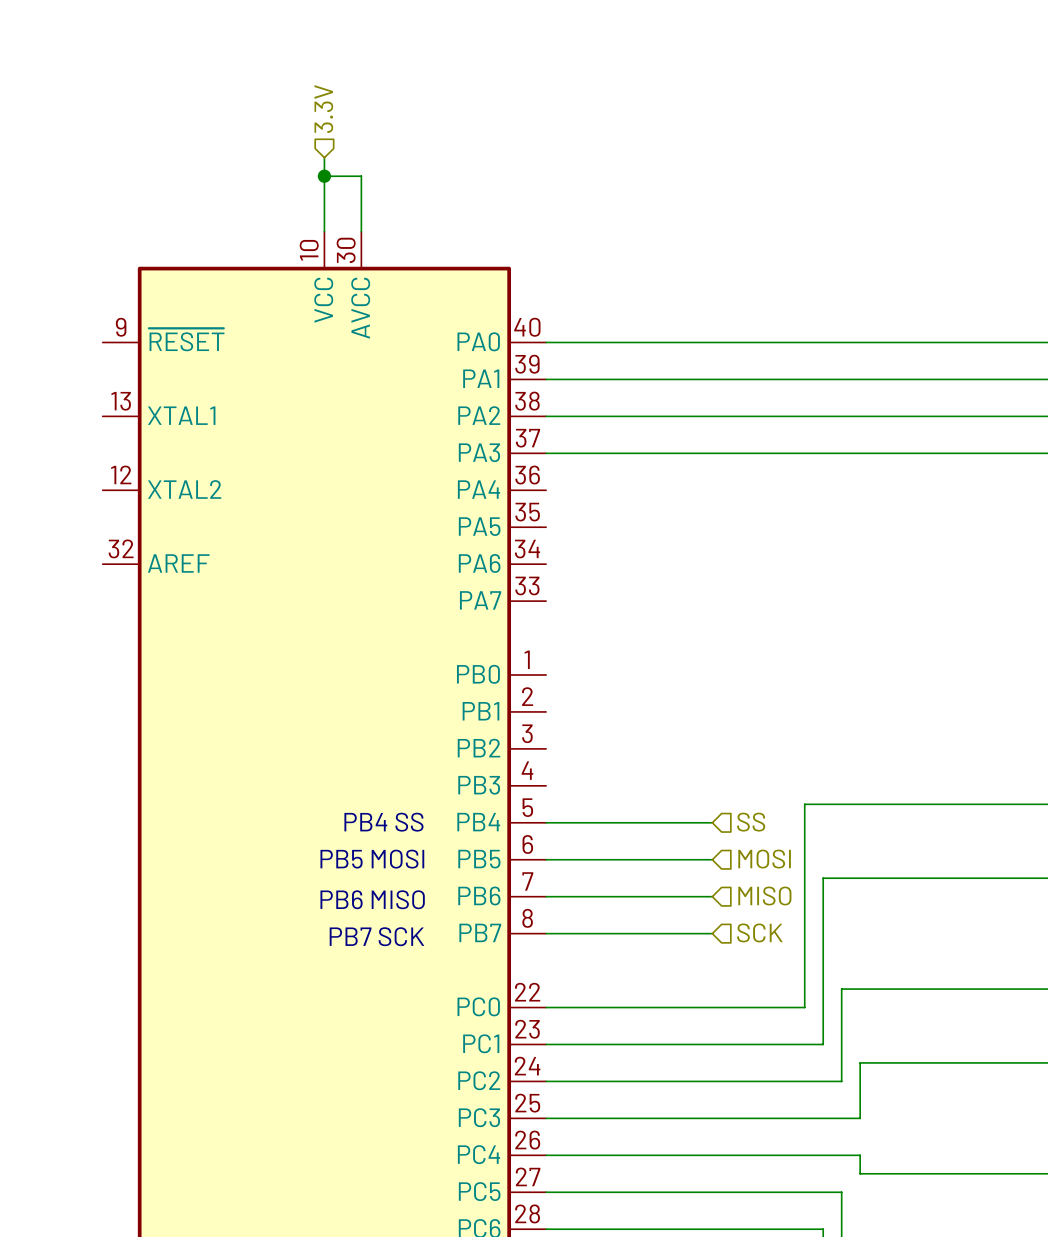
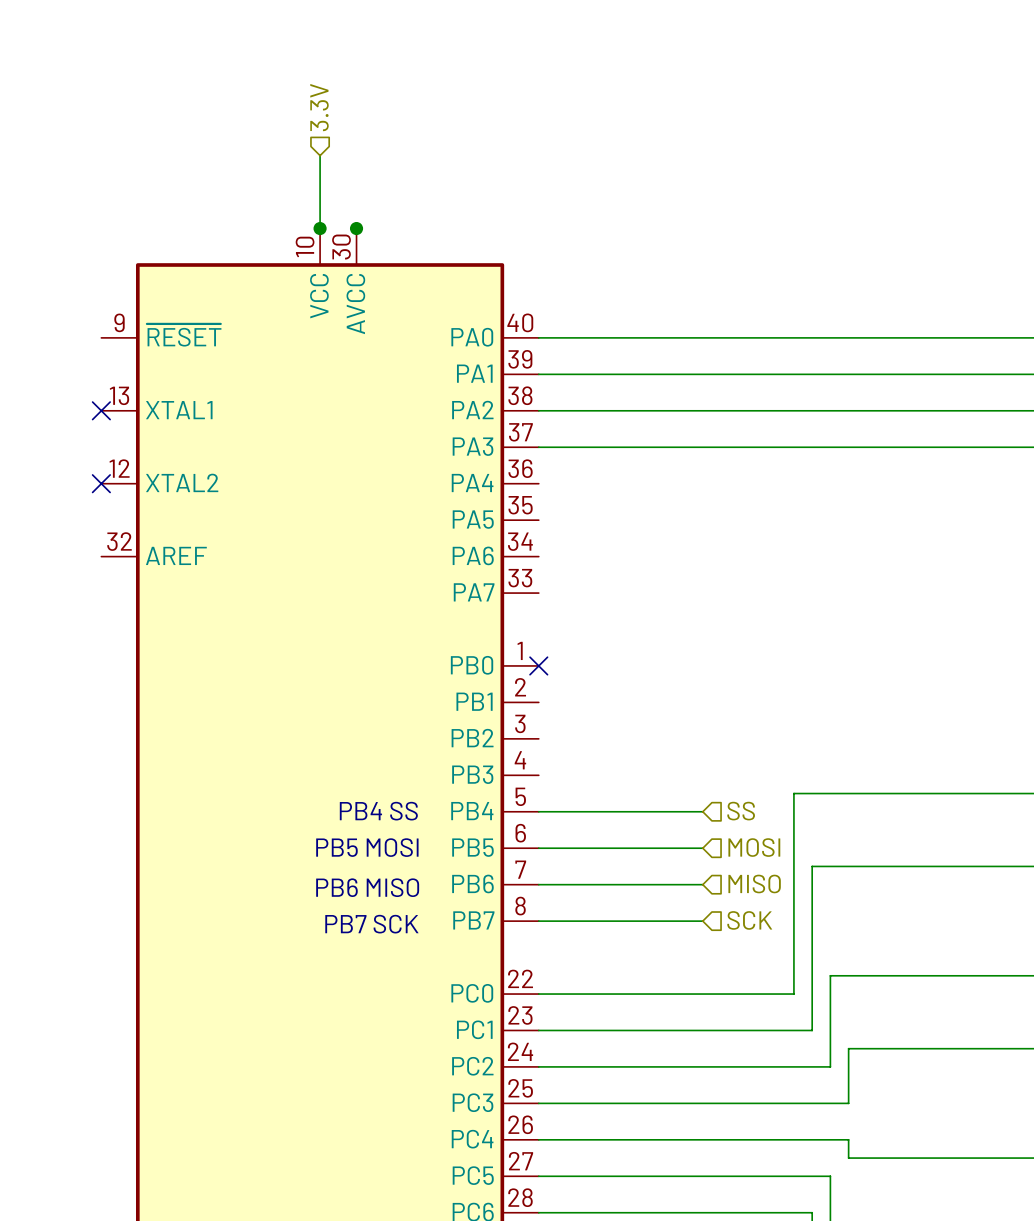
wire: (324, 176) (361, 176) (361, 231) -> none
junction: (324, 176) -> none
junction: none -> (320, 228)
junction: none -> (356, 228)
no-connect mark: none -> (101, 410)
no-connect mark: none -> (101, 483)
no-connect mark: none -> (538, 665)

